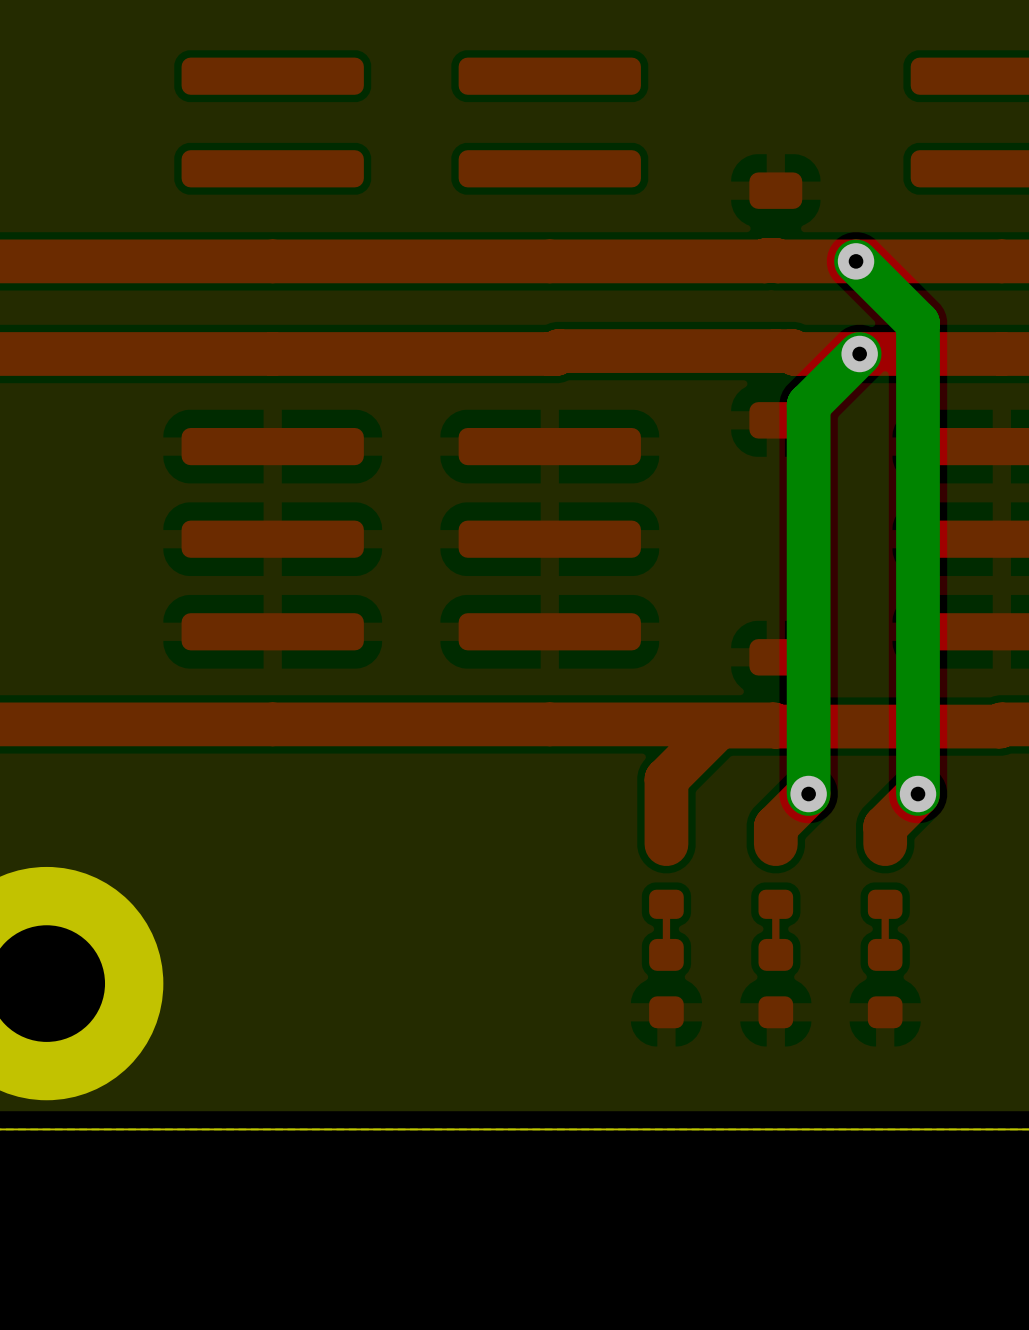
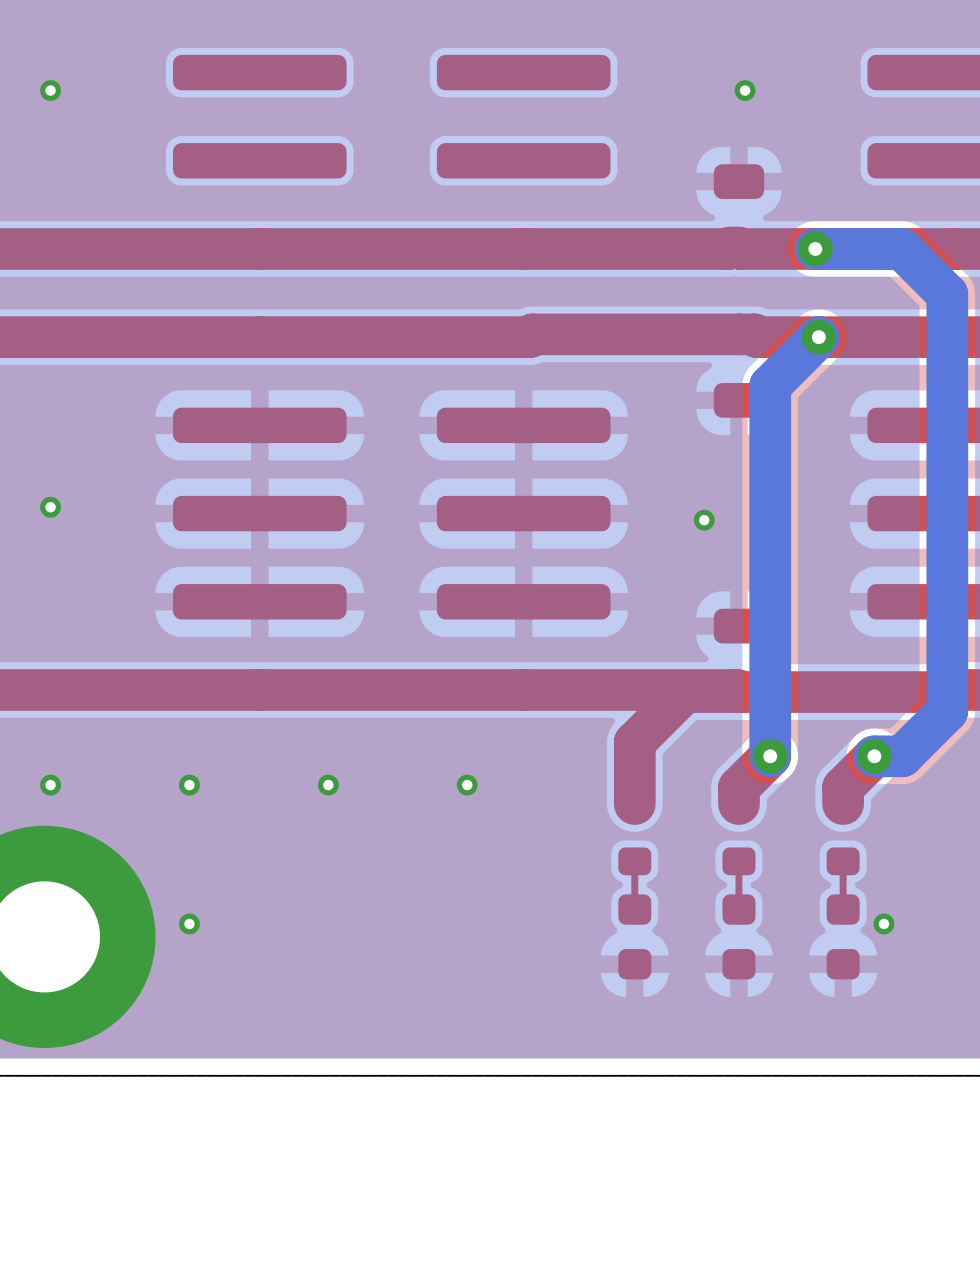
via: none -> (50, 90)
via: none -> (745, 90)
bottom track: (856, 261) (918, 323) (918, 794) -> (815, 248) (901, 248) (947, 294) (947, 711) (902, 756) (874, 756)
via: none -> (50, 507)
via: none -> (704, 520)
via: none -> (50, 785)
via: none -> (189, 785)
via: none -> (328, 785)
via: none -> (467, 785)
via: none -> (189, 923)
via: none -> (883, 923)

